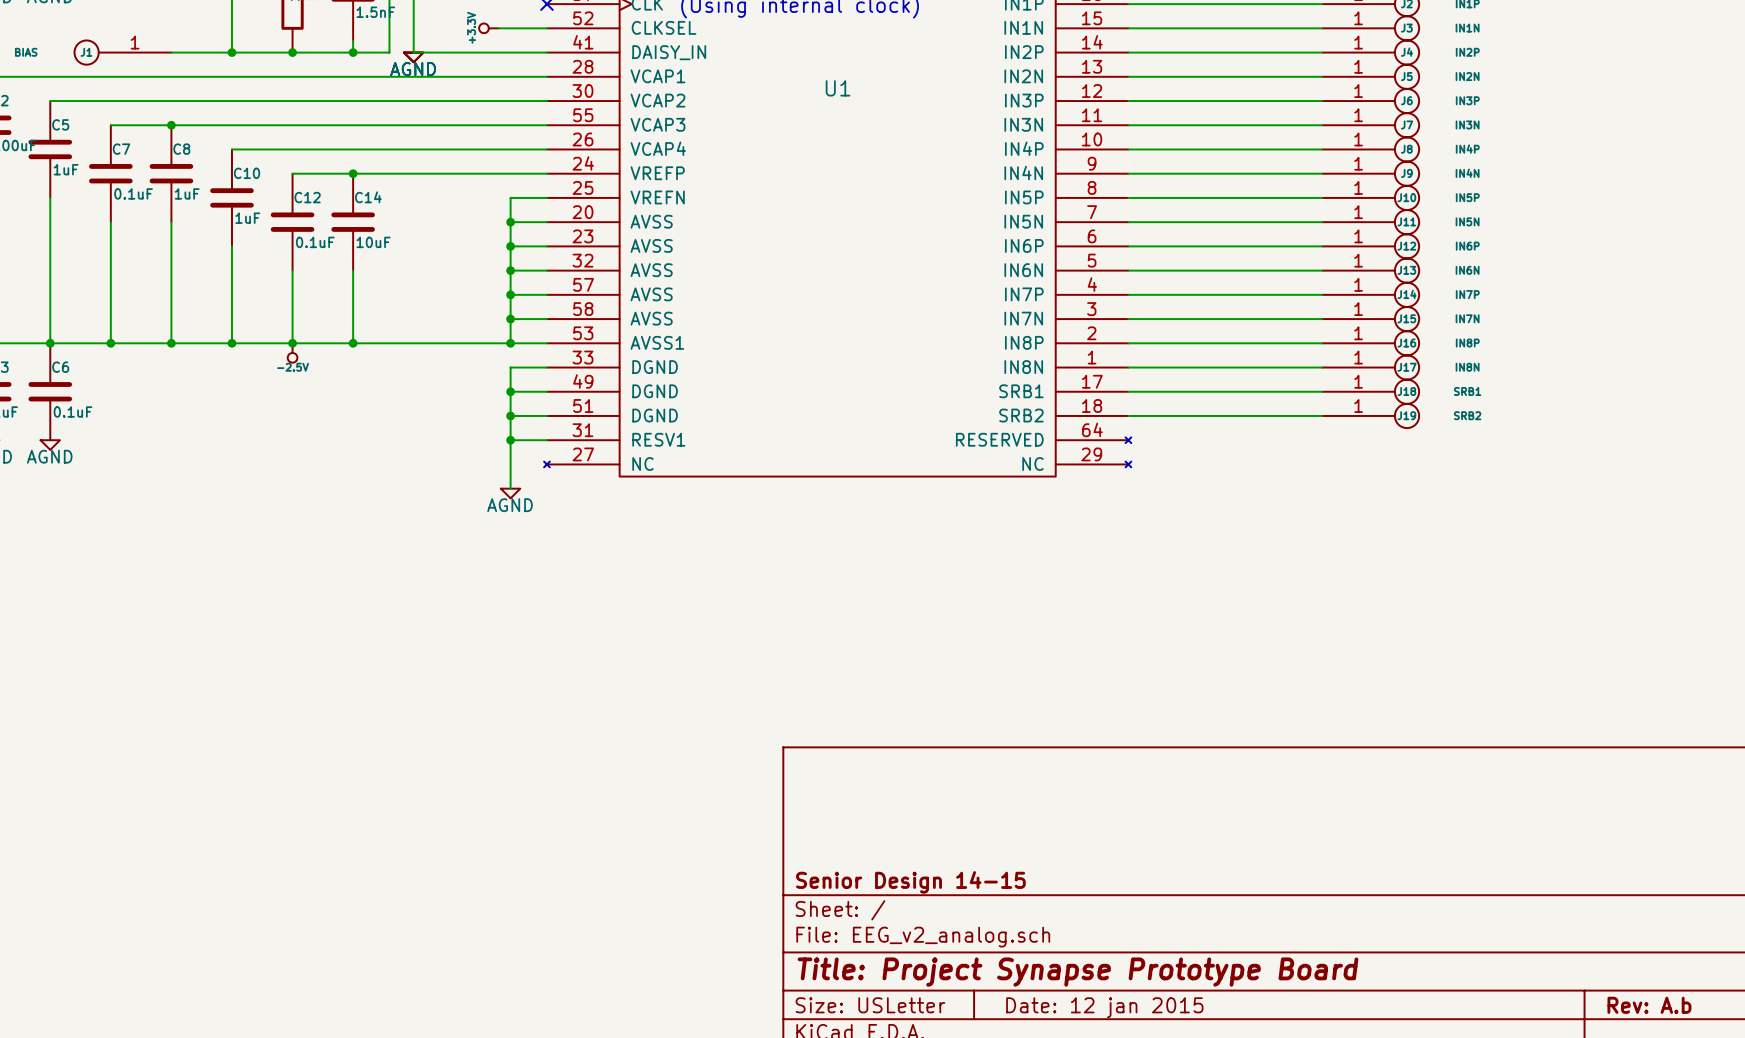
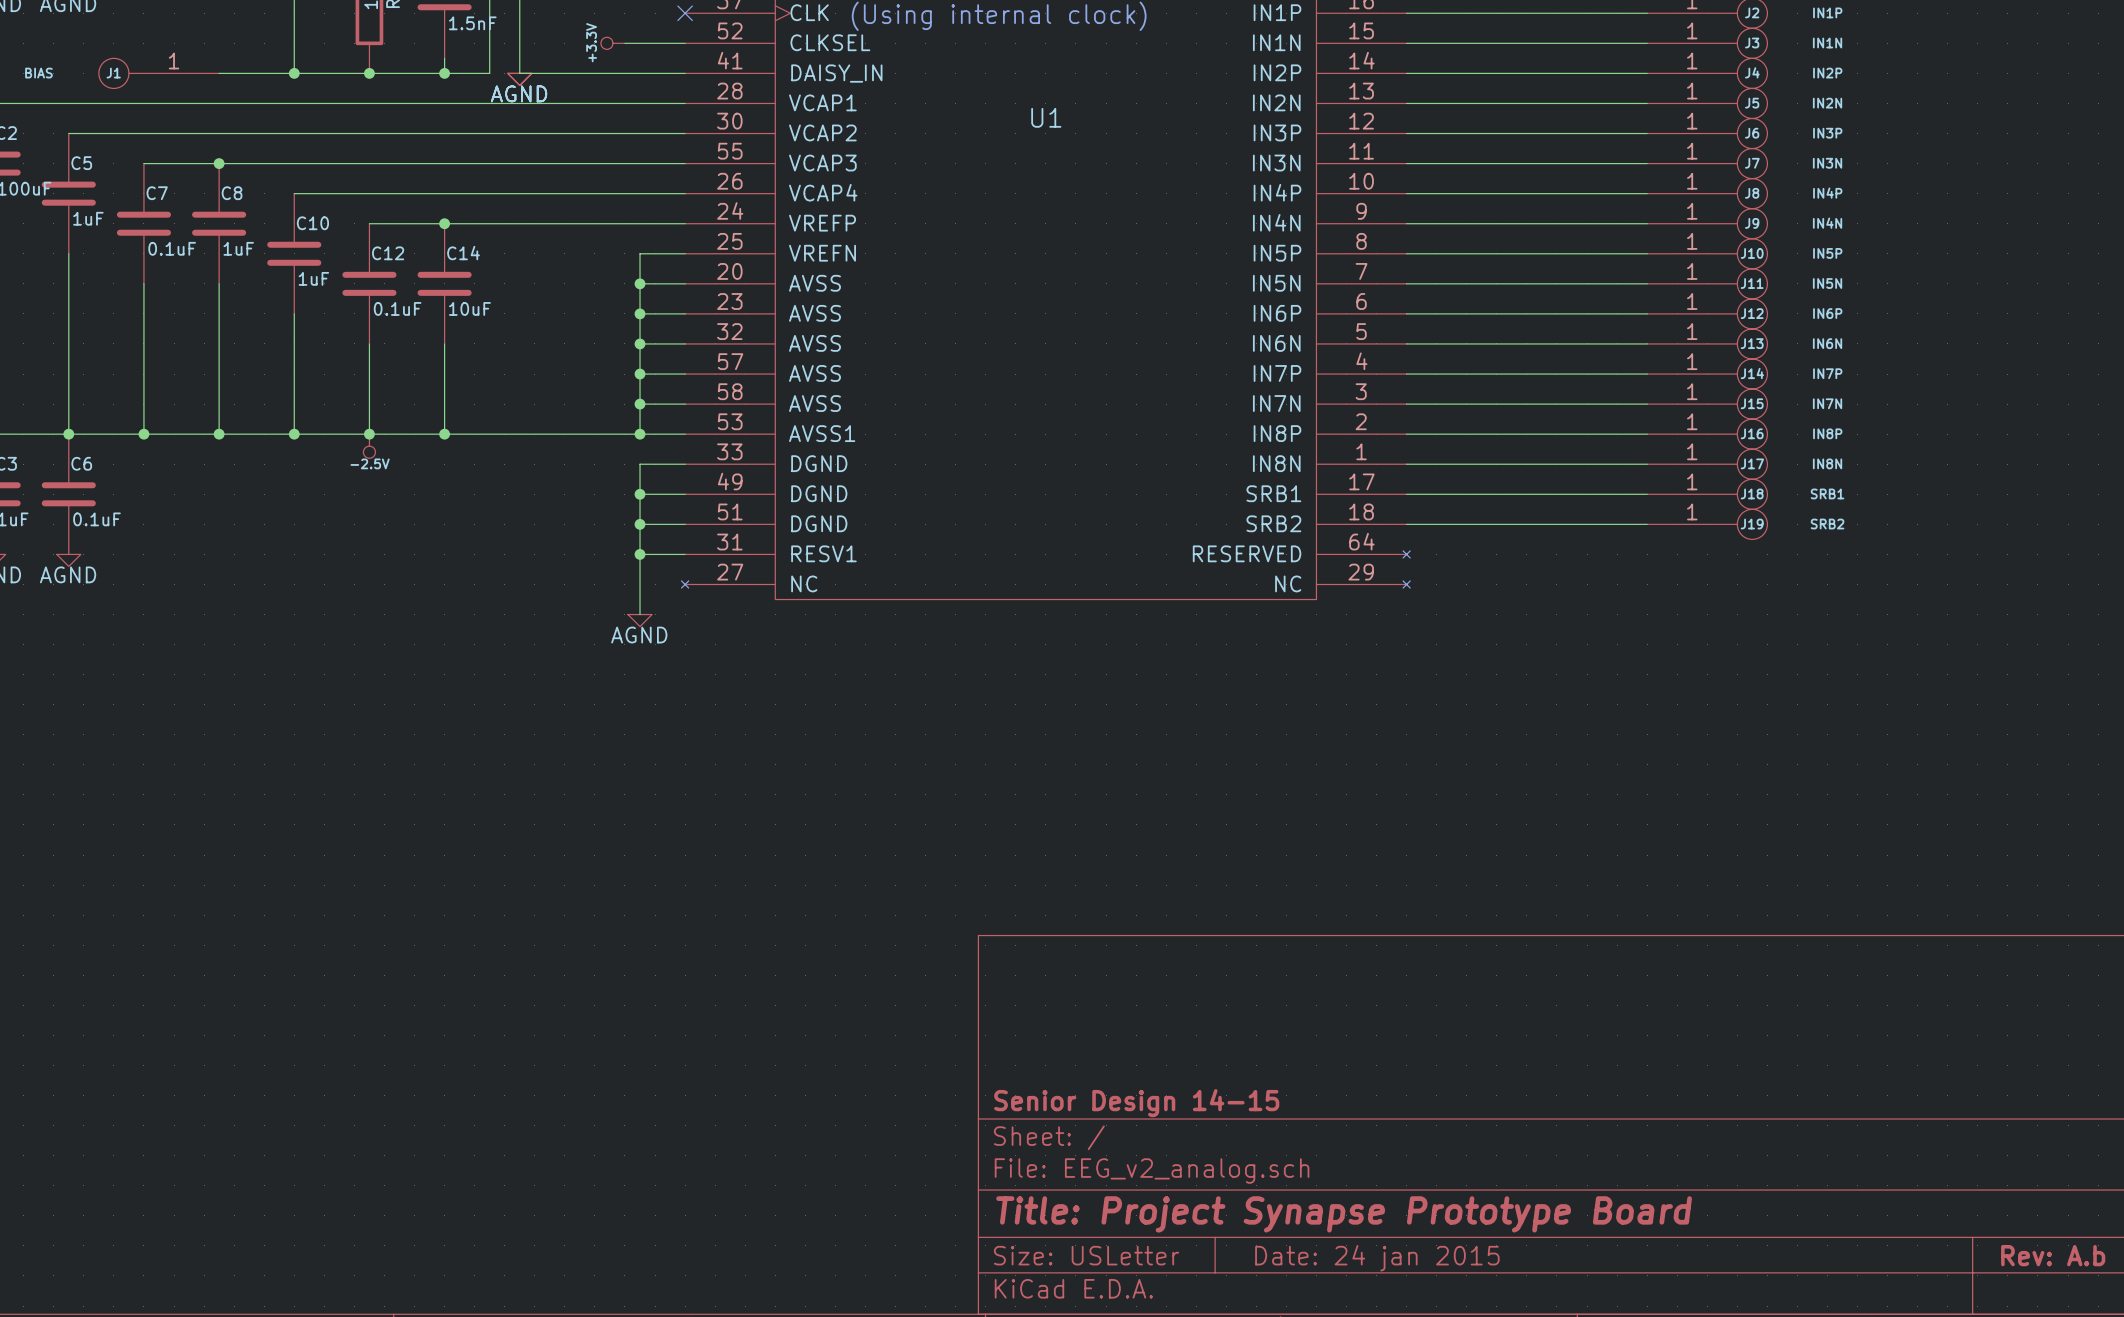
title block: Date: 12 jan 2015 (1104, 1007) -> Date: 24 jan 2015 (1377, 1258)

